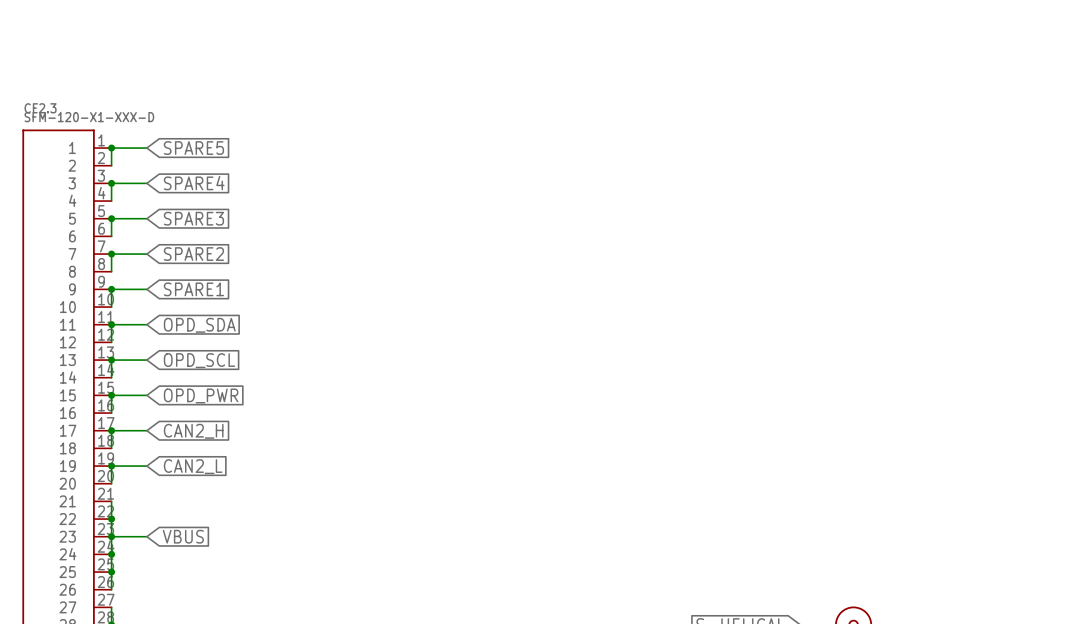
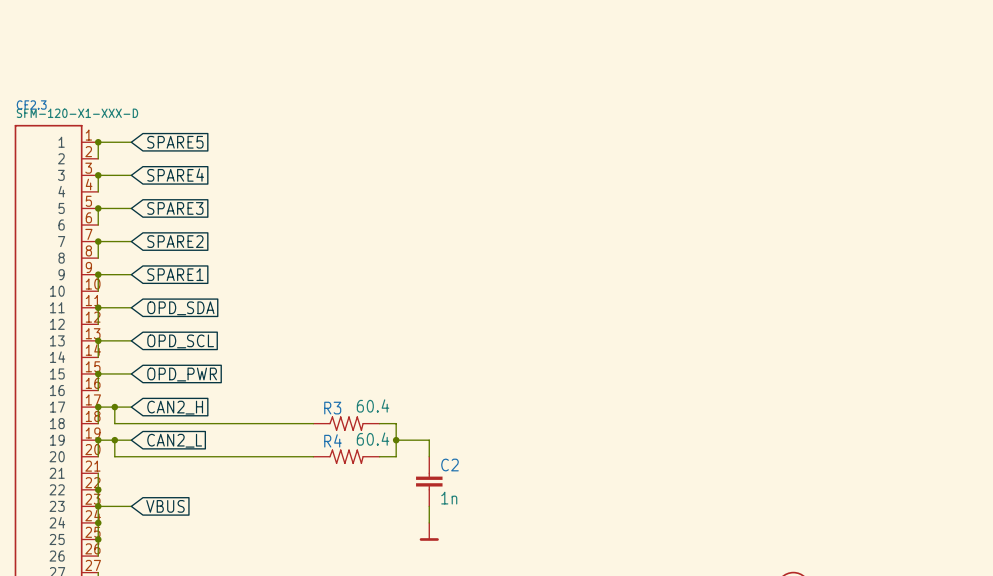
wire: none -> (114, 407) (114, 423) (313, 423)
junction: none -> (114, 407)
R3: none -> 60.4 (346, 423)
wire: none -> (379, 423) (396, 423) (396, 456) (379, 456)
wire: none -> (114, 440) (114, 456) (313, 456)
junction: none -> (114, 440)
wire: none -> (396, 440) (429, 440) (429, 456)
junction: none -> (396, 440)
R4: none -> 60.4 (346, 456)
C2: none -> 1n (429, 481)
wire: none -> (429, 506) (429, 522)
power symbol: none -> (429, 531)

